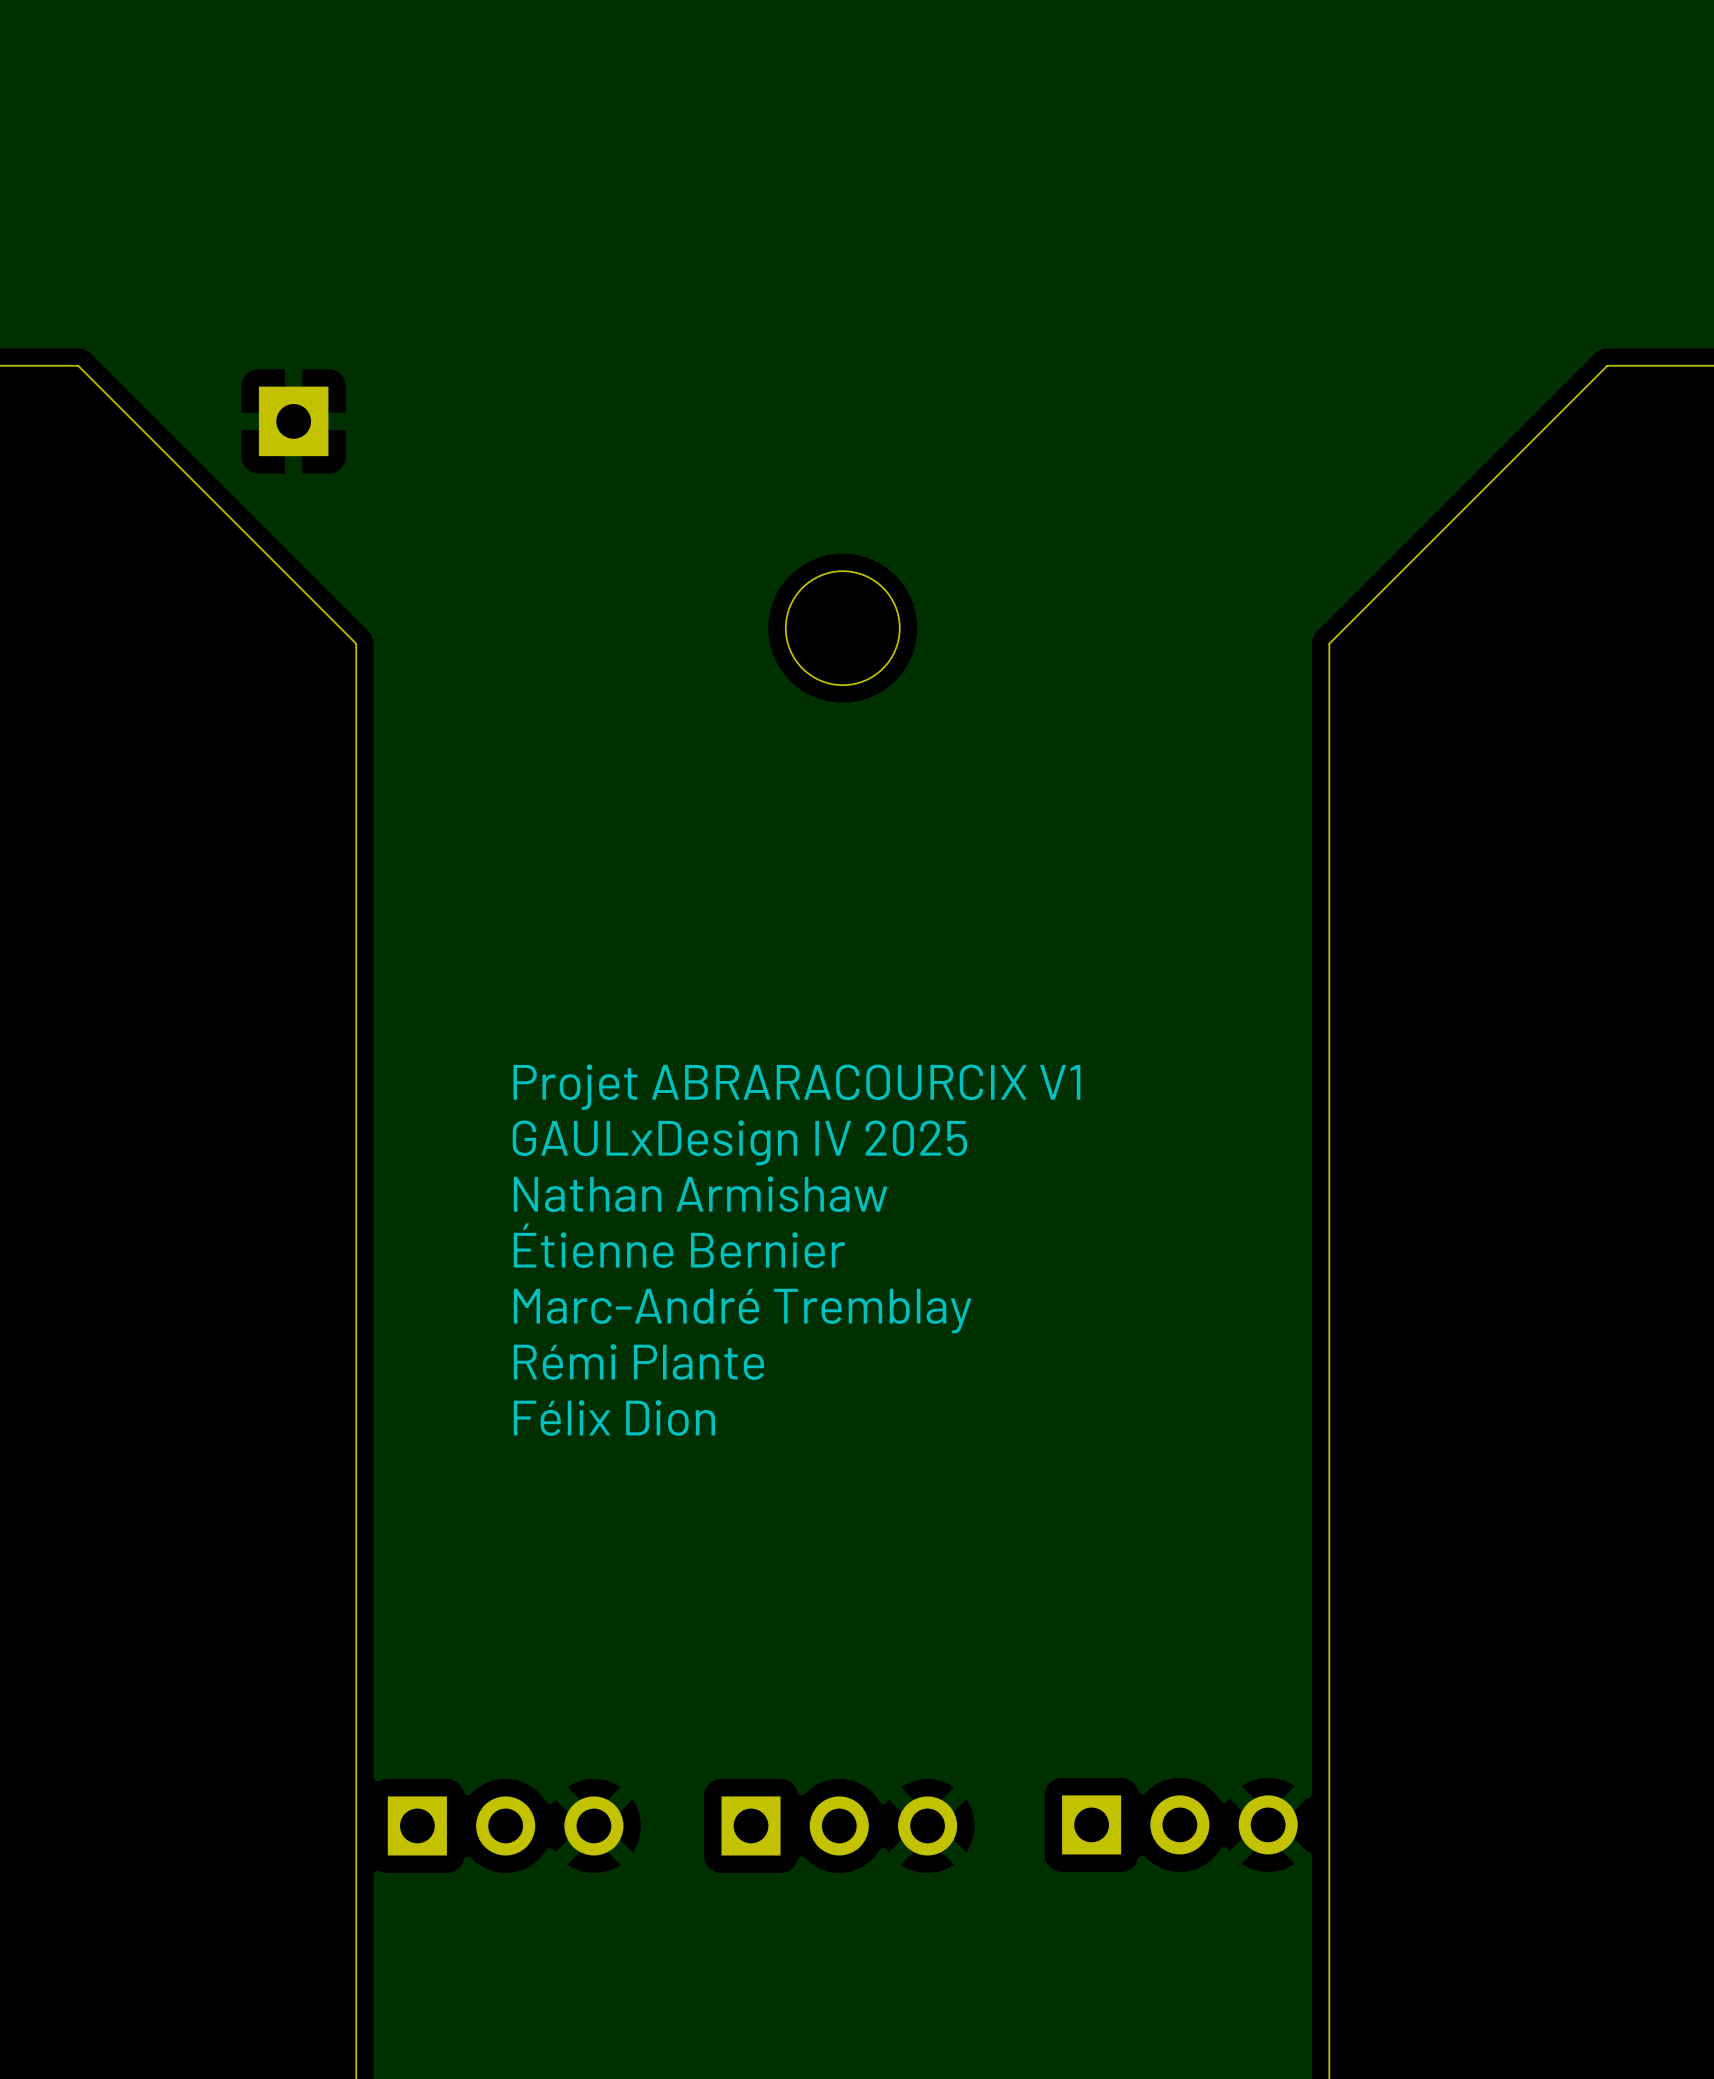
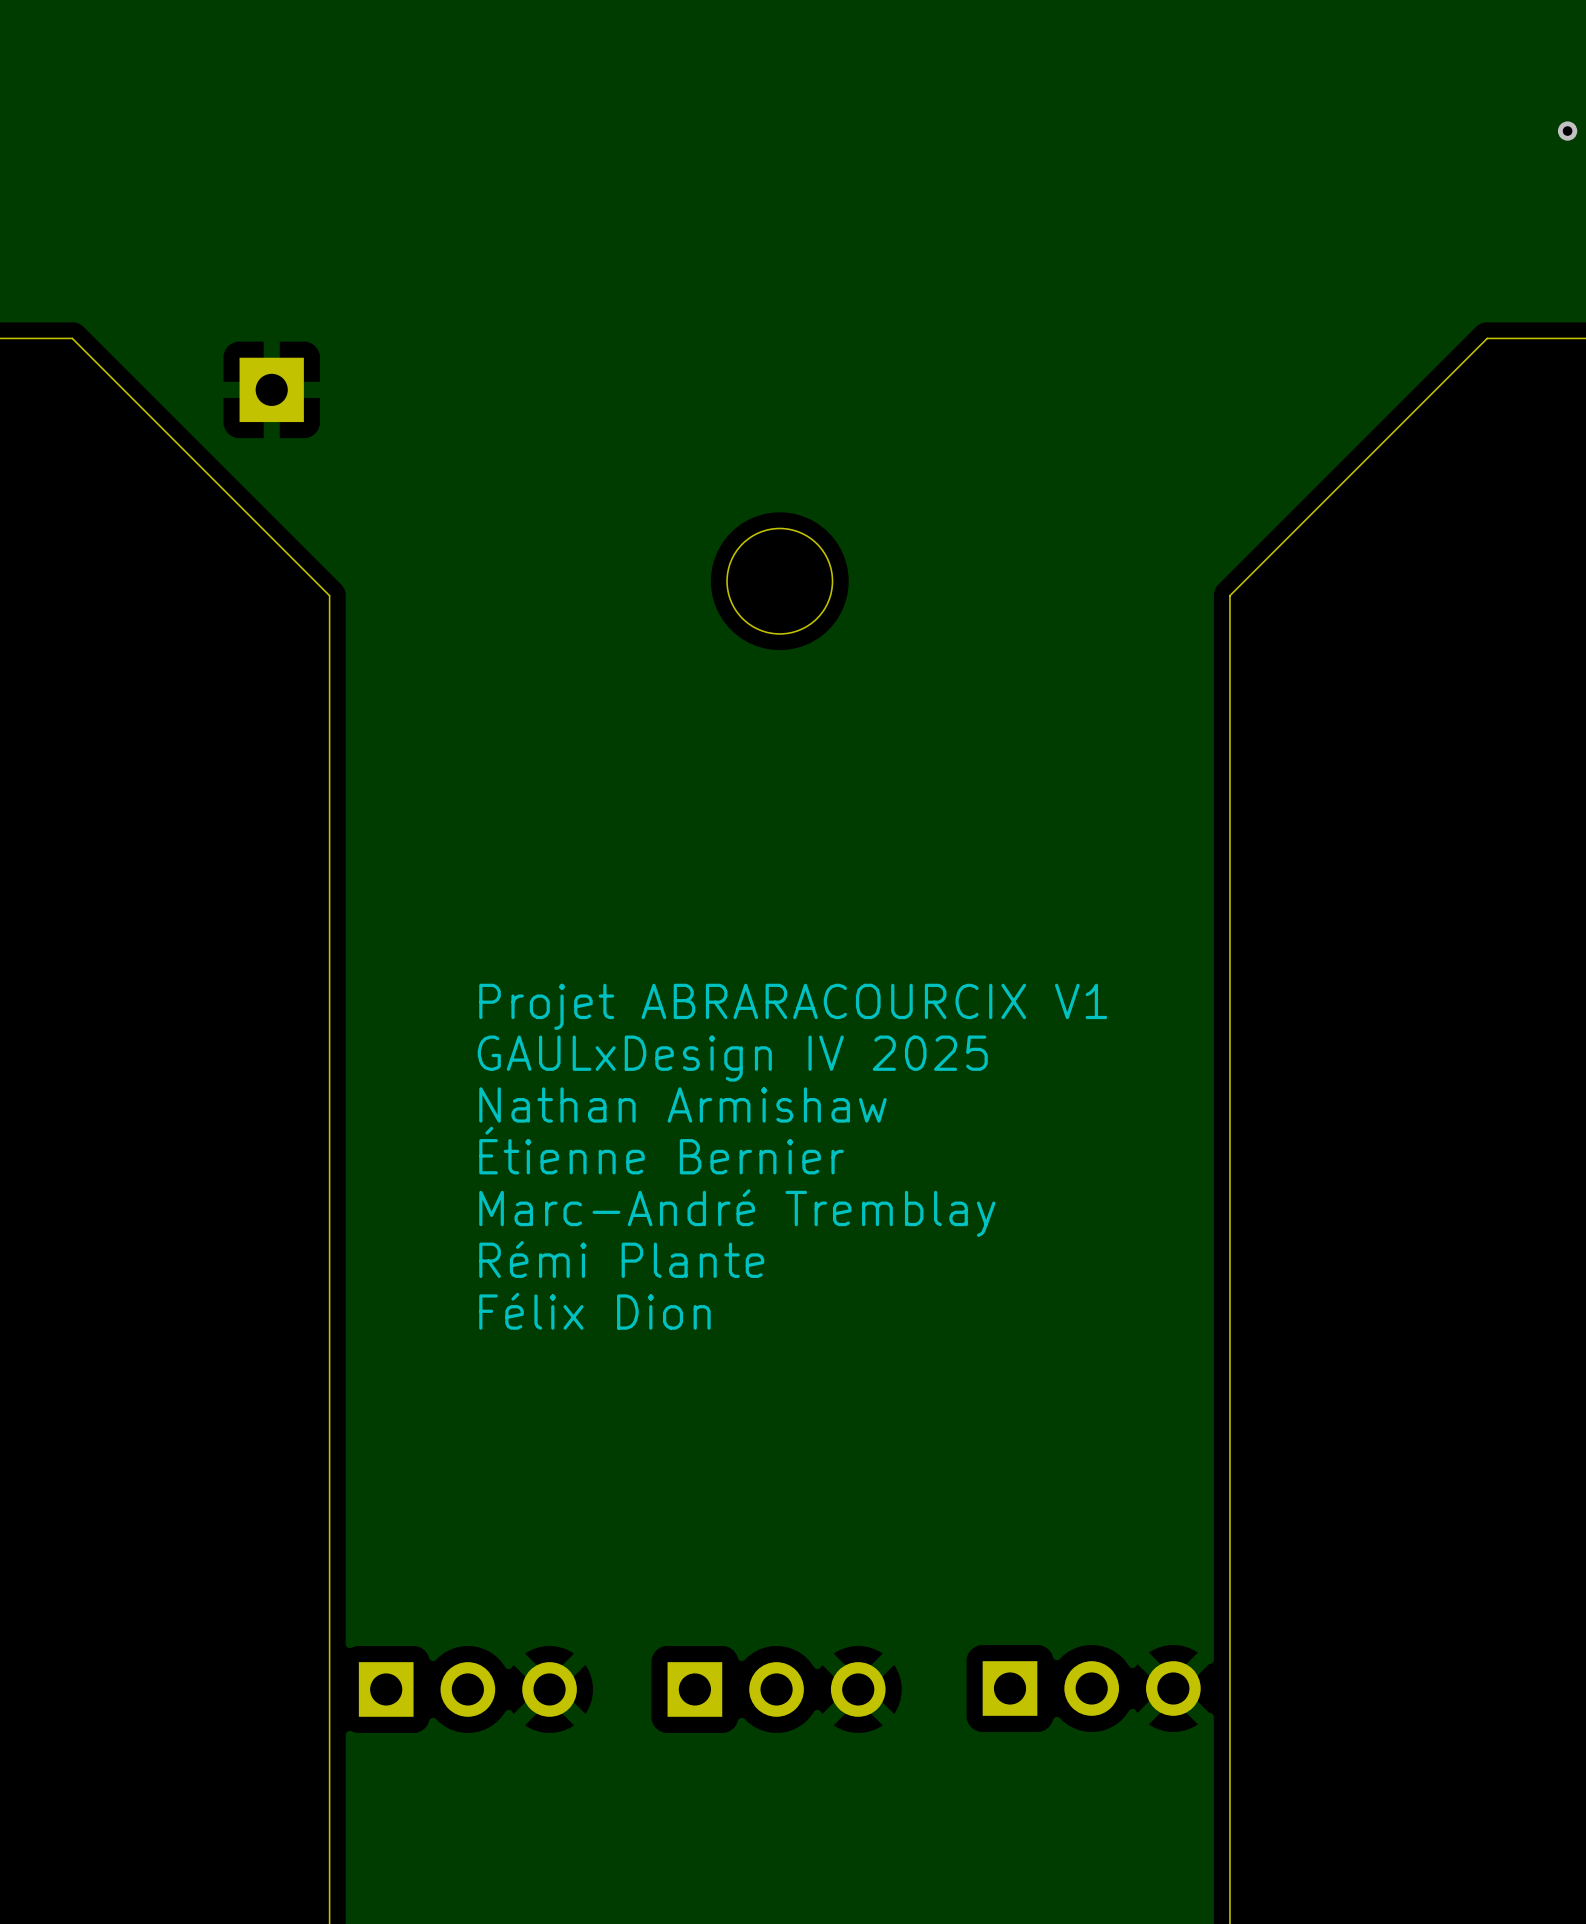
via: none -> (1567, 131)

